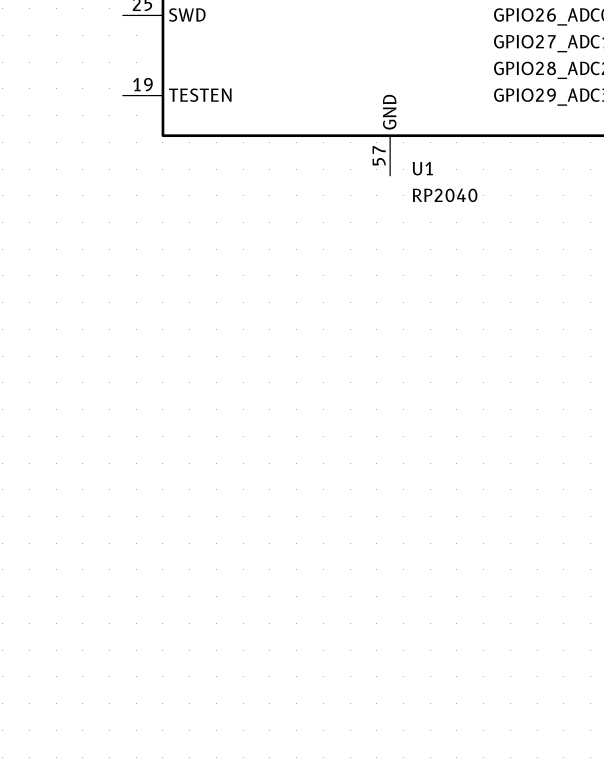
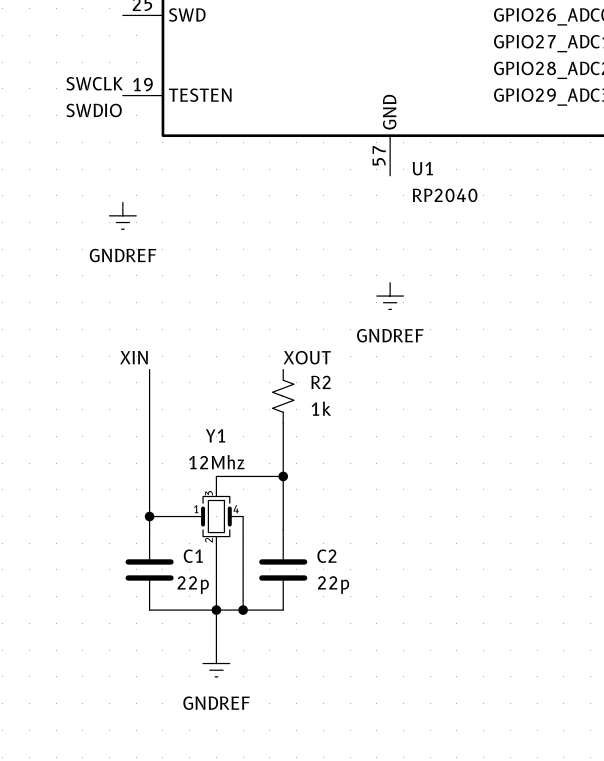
label: none -> SWCLK (94, 83)
label: none -> SWDIO (94, 110)
power symbol: none -> GNDREF (122, 215)
power symbol: none -> GNDREF (390, 296)
label: none -> XIN (133, 357)
label: none -> XOUT (307, 357)
wire: none -> (149, 369) (149, 529)
R2: none -> 1k (283, 396)
wire: none -> (283, 422) (283, 529)
wire: none -> (283, 476) (216, 476) (216, 489)
junction: none -> (283, 476)
wire: none -> (149, 516) (189, 516)
junction: none -> (149, 516)
Y1: none -> 12Mhz (216, 516)
wire: none -> (243, 516) (243, 610)
wire: none -> (216, 543) (216, 650)
C1: none -> 22p (149, 569)
C2: none -> 22p (283, 569)
wire: none -> (149, 610) (283, 610)
junction: none -> (216, 610)
junction: none -> (243, 610)
power symbol: none -> GNDREF (216, 663)

